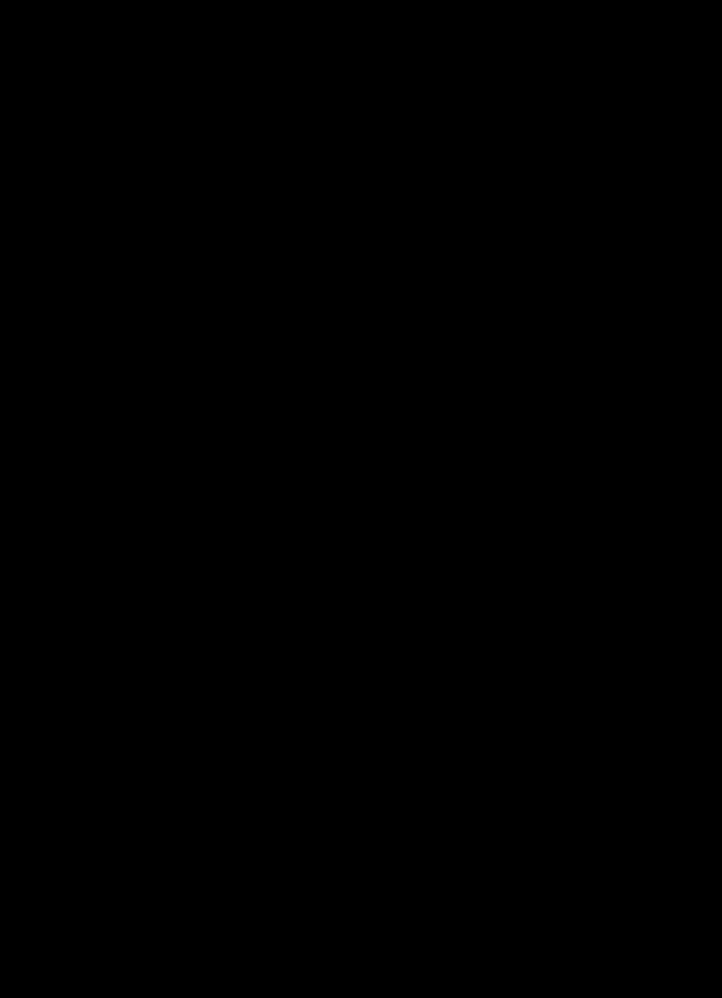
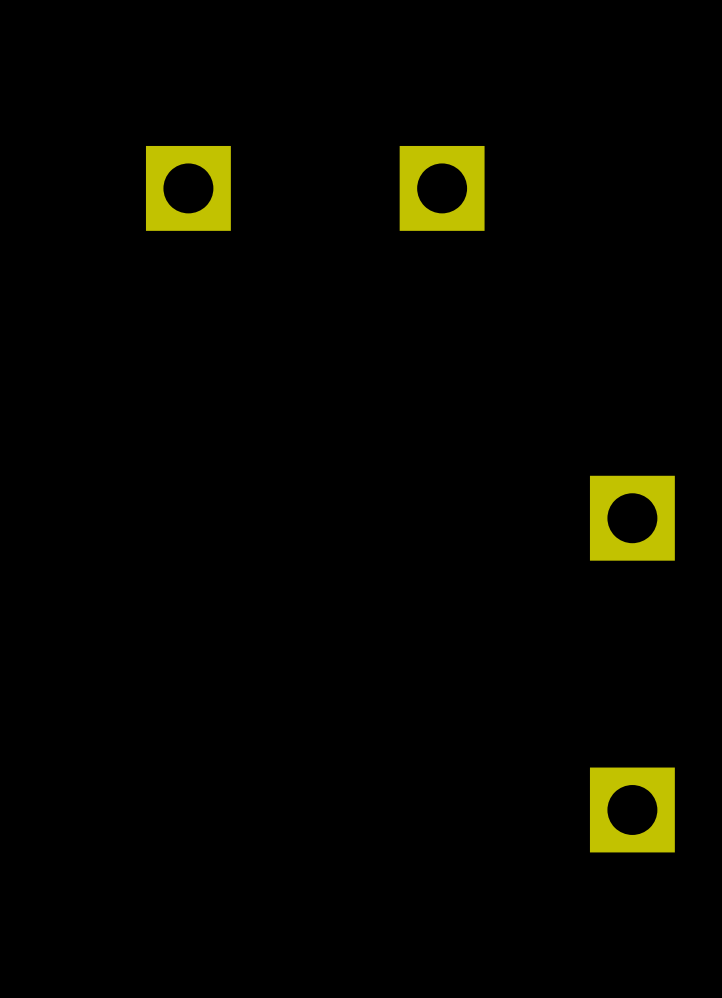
part: none -> (188, 188)
part: none -> (442, 188)
part: none -> (632, 518)
part: none -> (632, 809)

